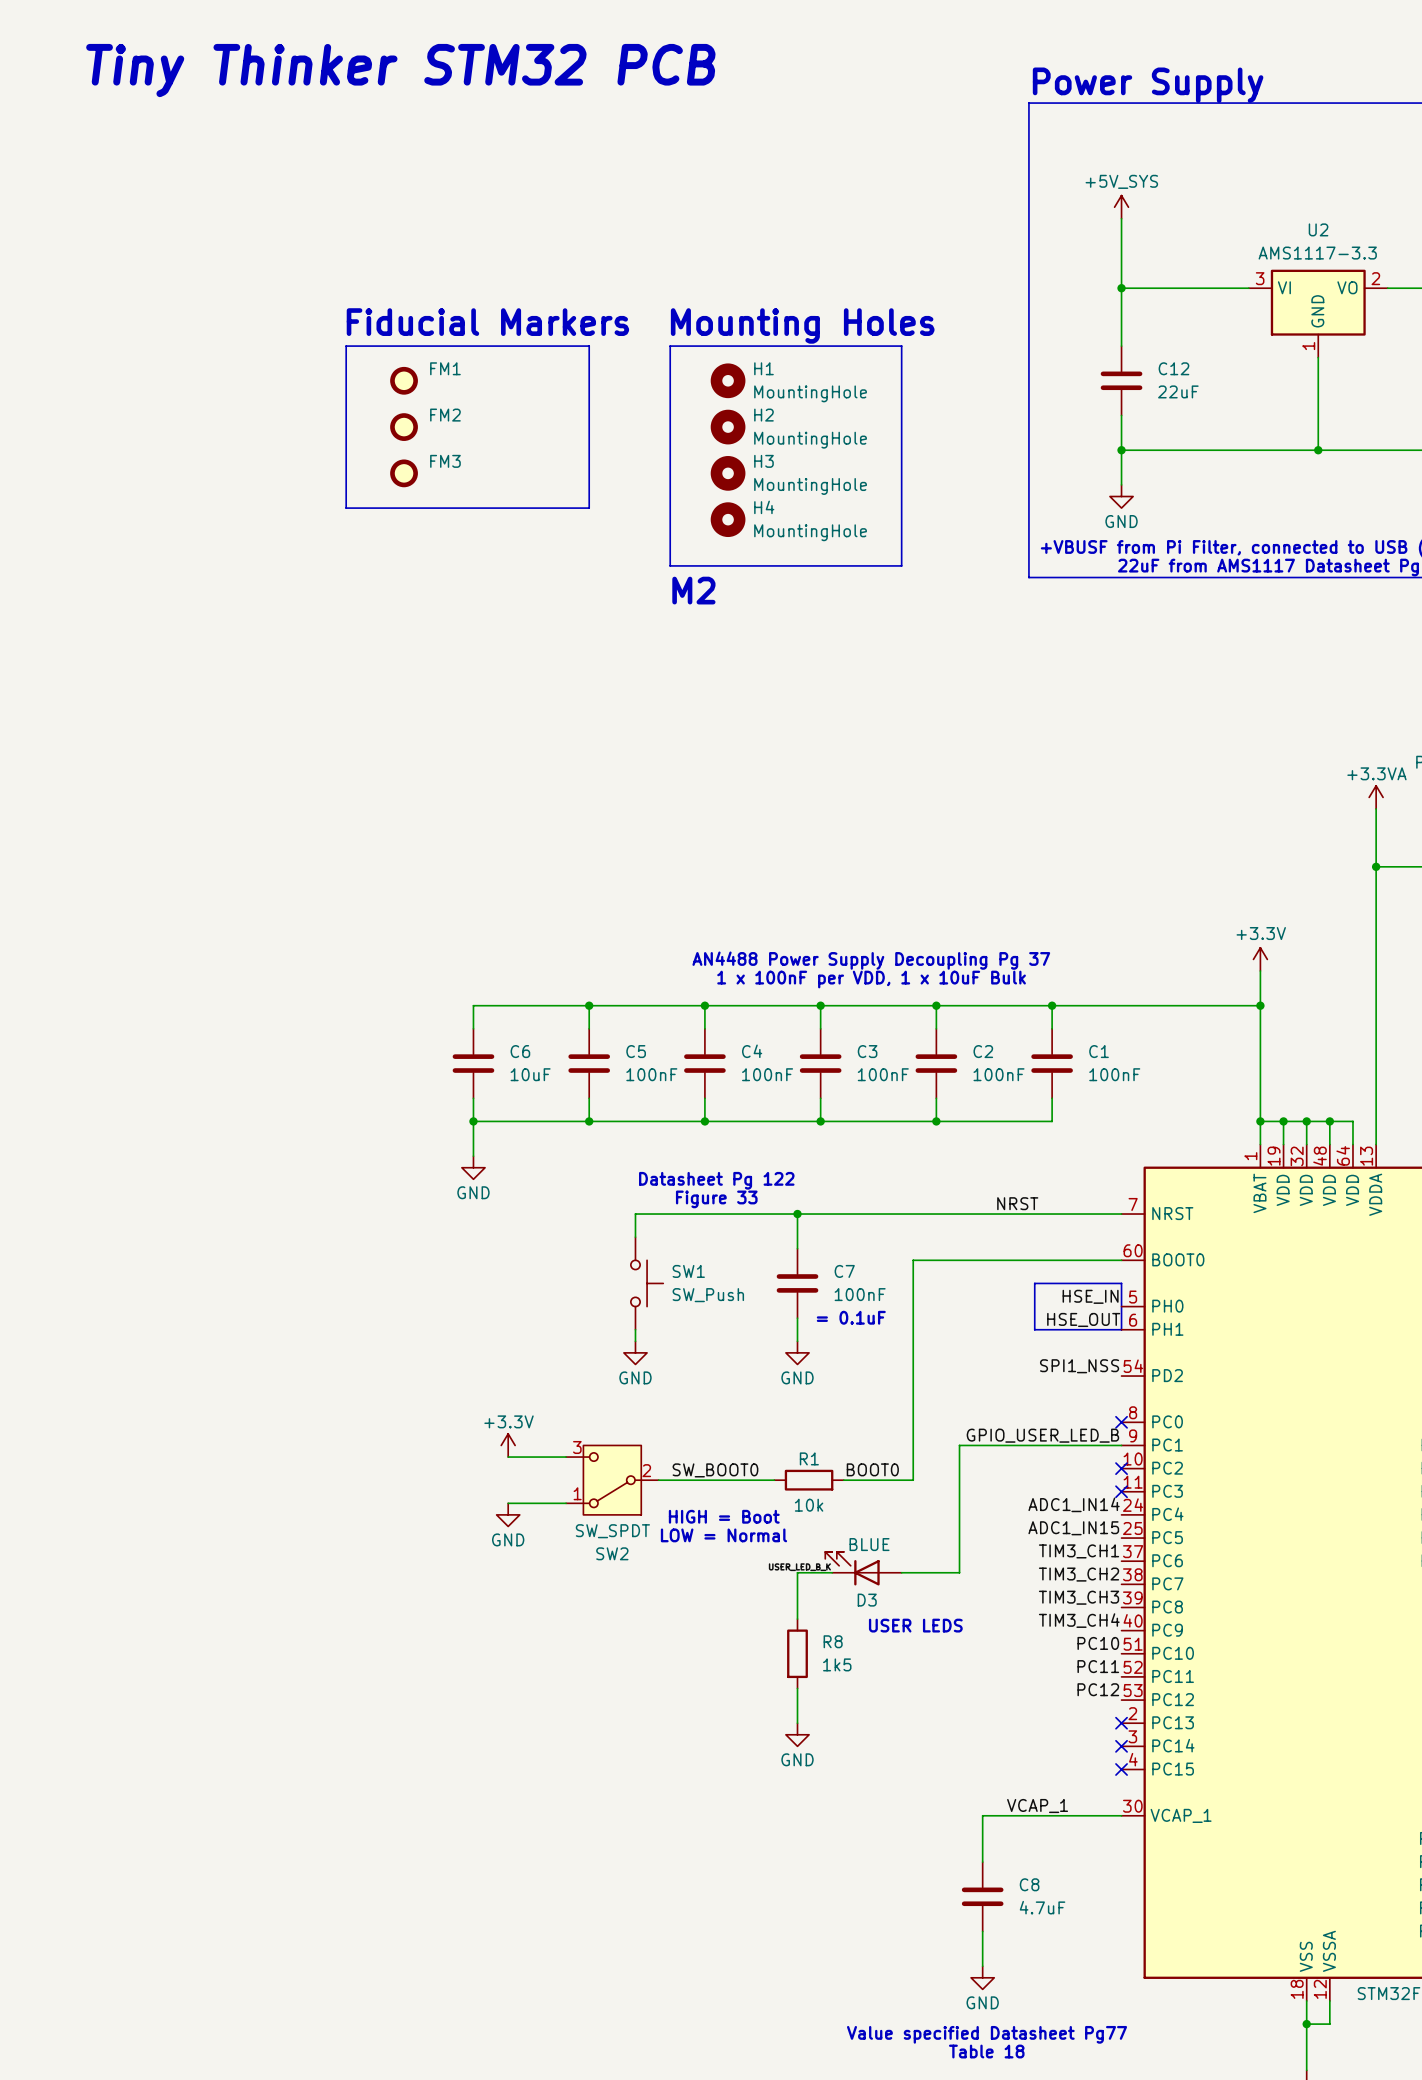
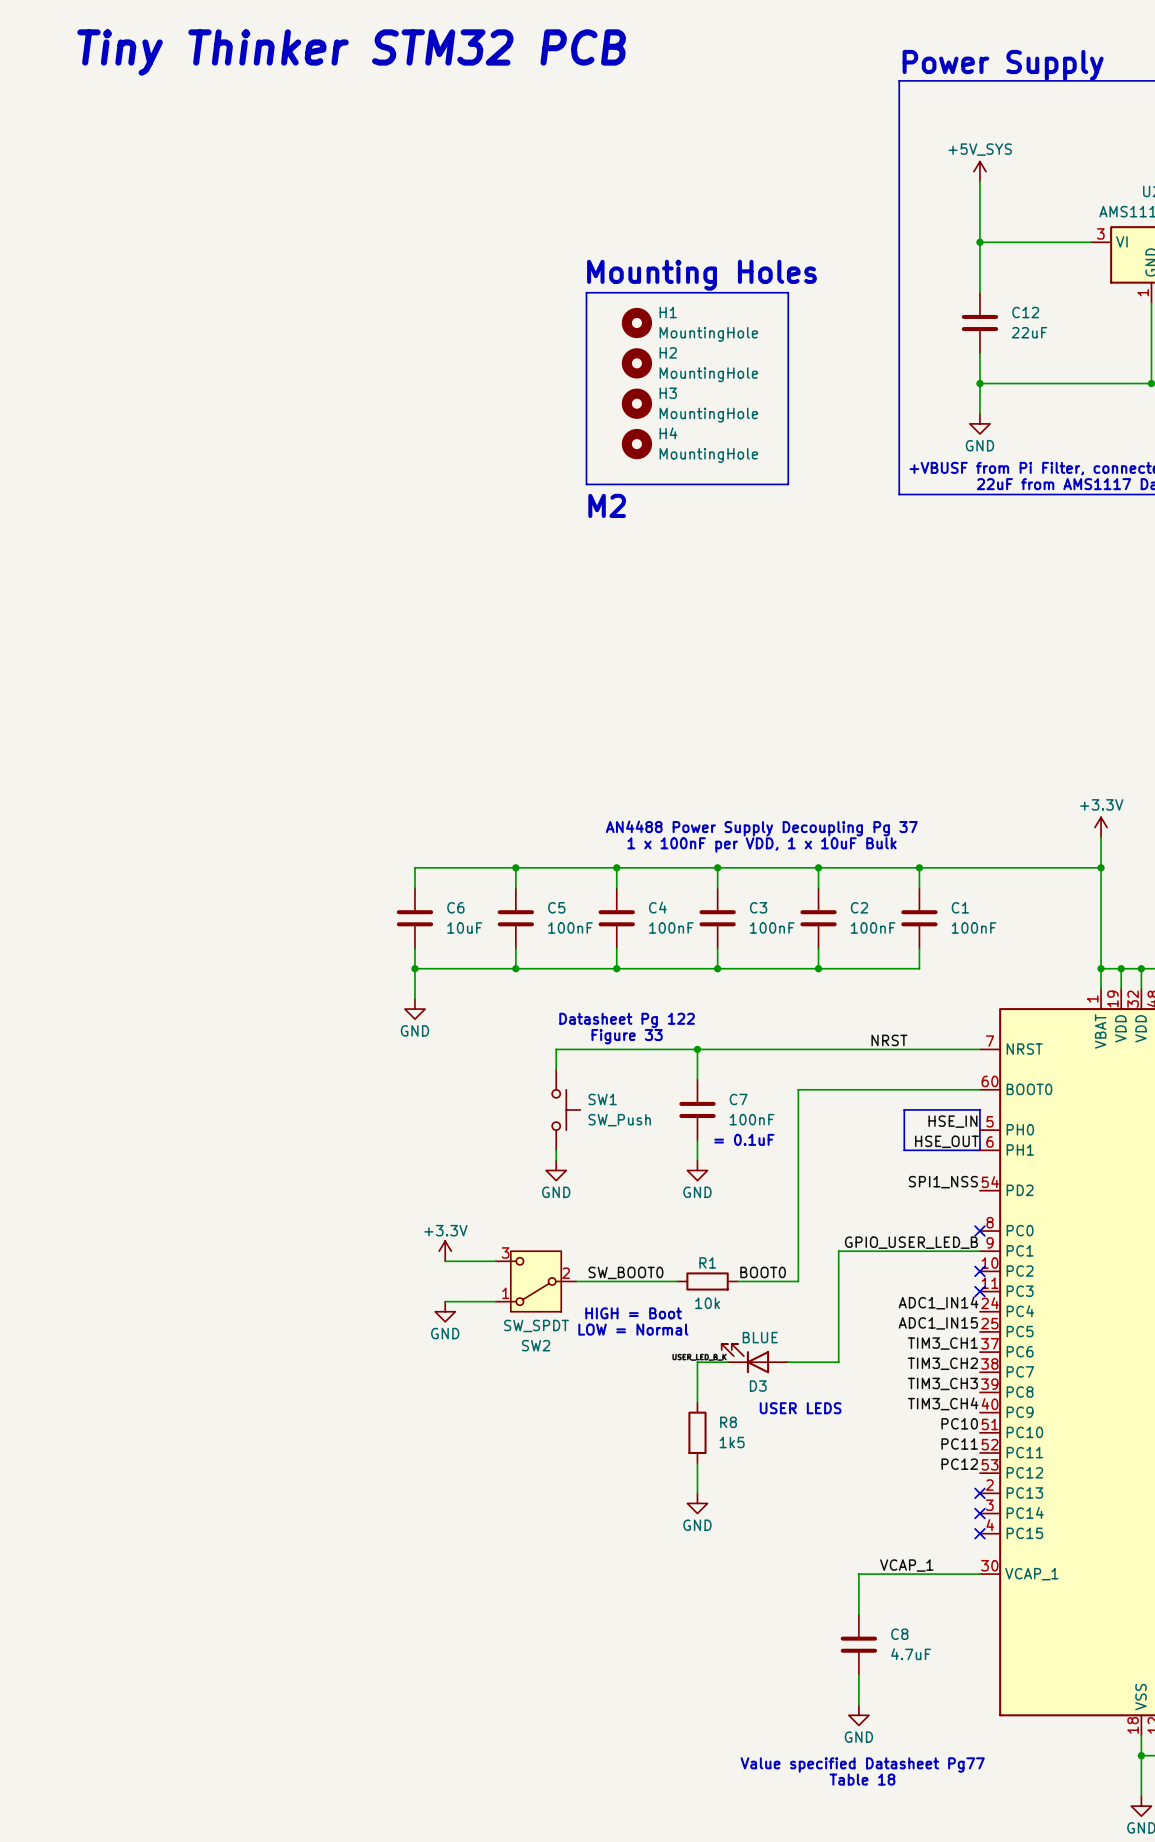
text: Fiducial Markers (487, 322) -> none
line: (346, 346) (589, 346) (589, 508) (346, 508) (346, 346) -> none
FM1: (404, 380) -> none
FM2: (404, 427) -> none
FM3: (404, 473) -> none

